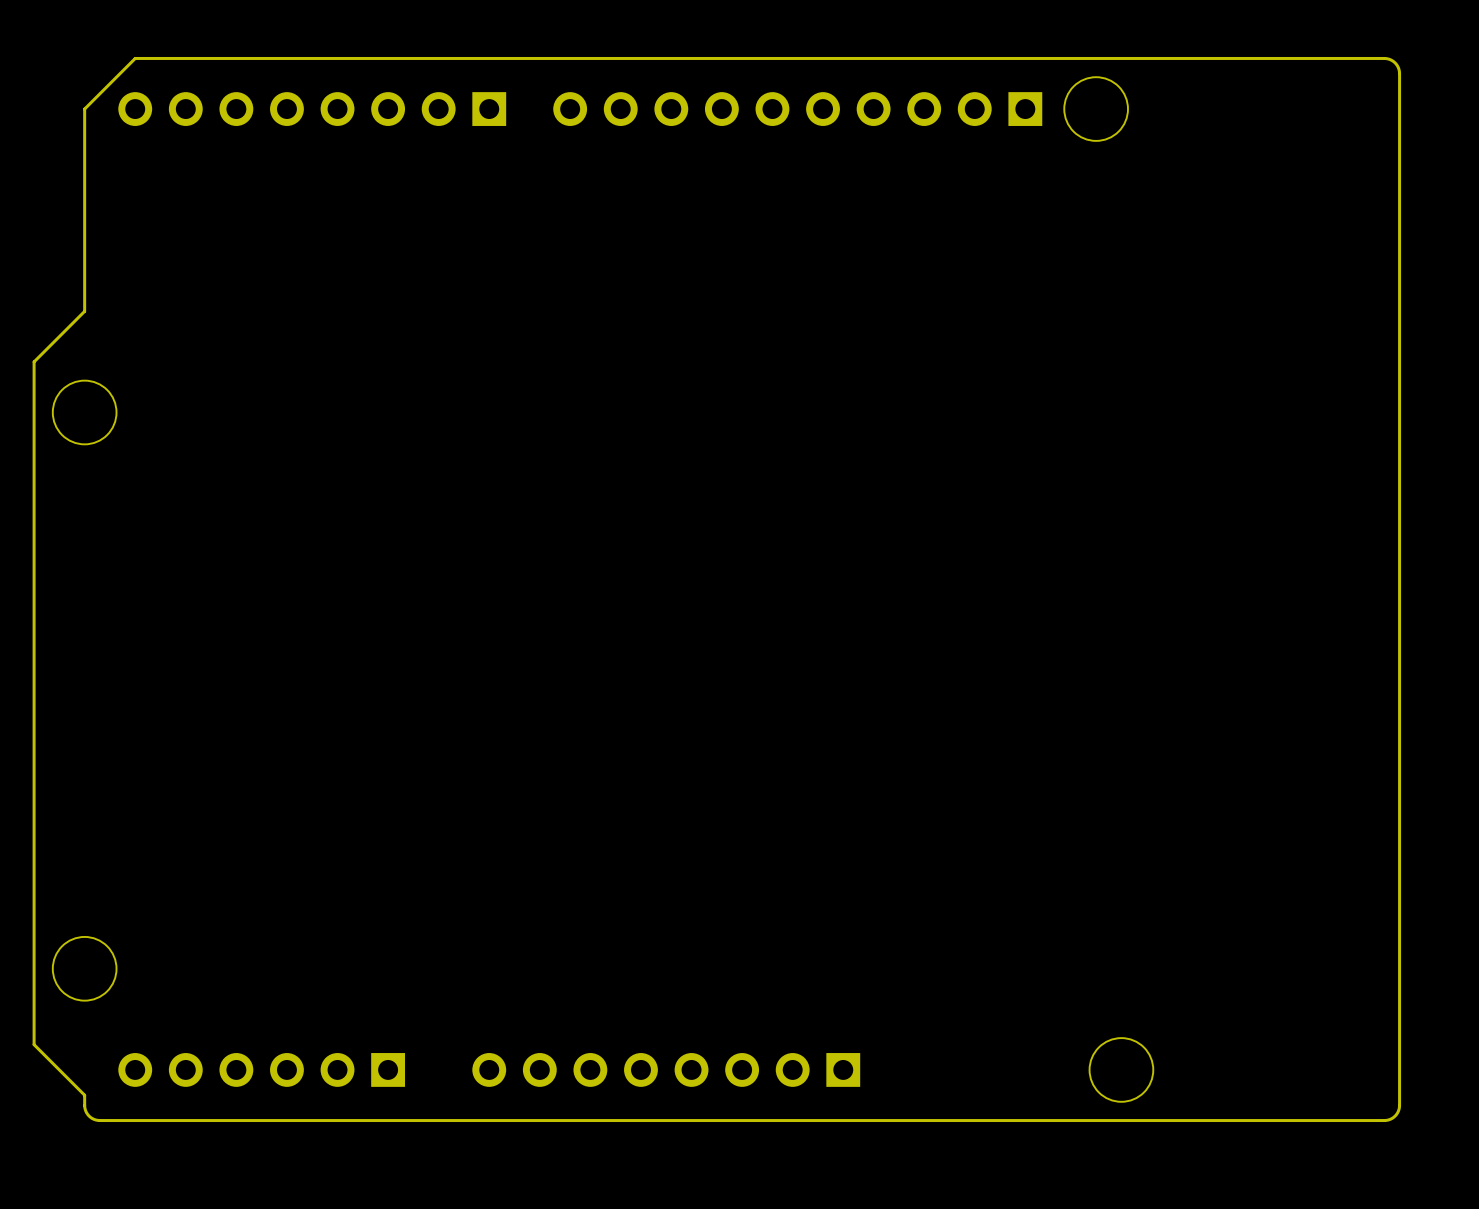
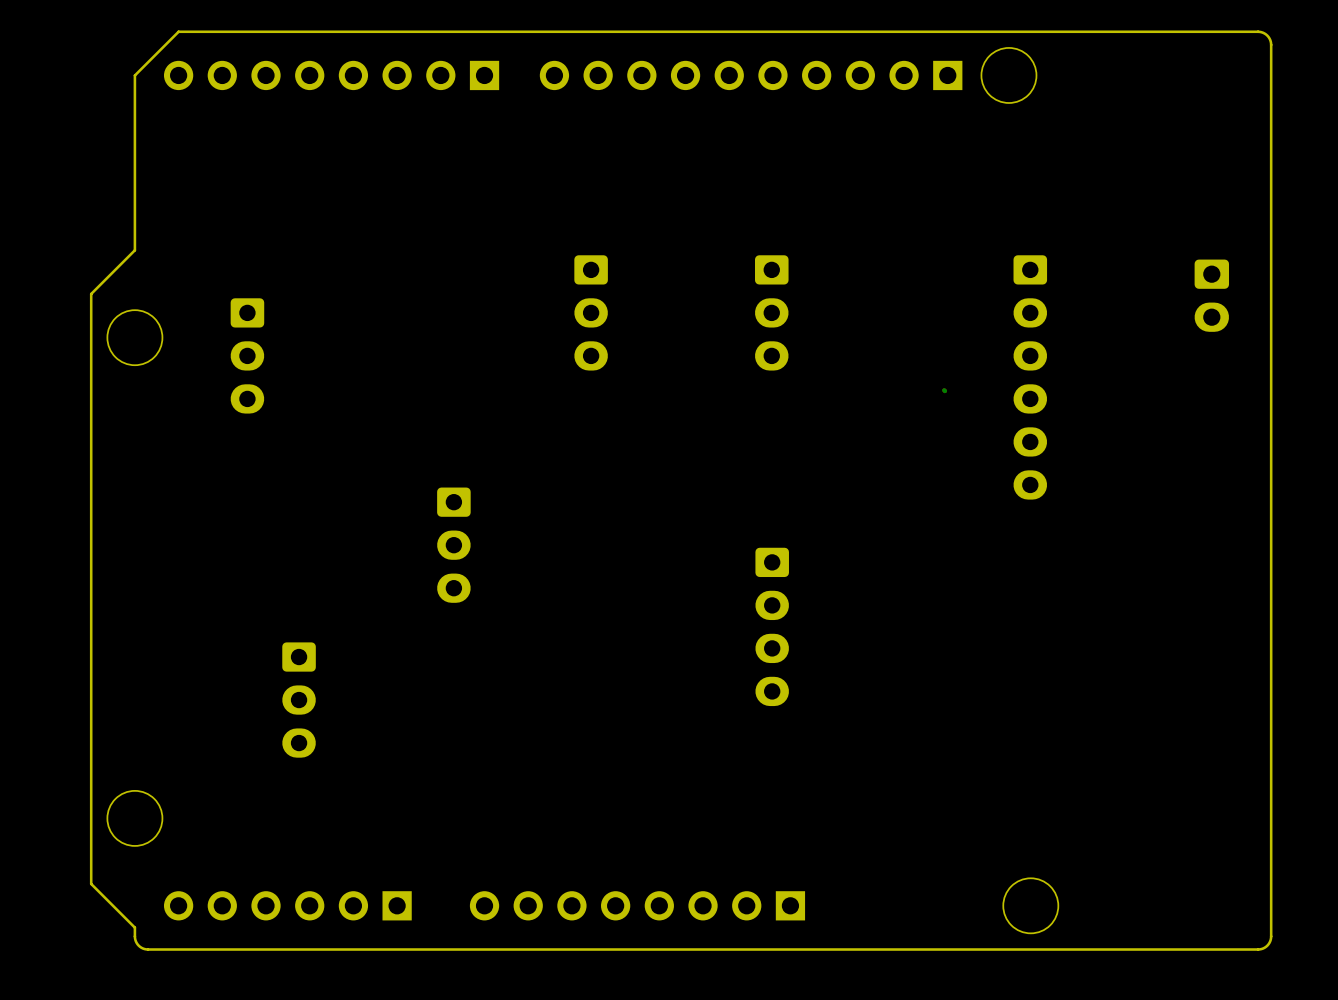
part: none -> (1211, 295)
part: none -> (591, 312)
part: none -> (771, 312)
part: none -> (247, 355)
part: none -> (1030, 377)
bottom track: none -> (944, 390) (944, 391)
part: none -> (453, 545)
part: none -> (772, 626)
part: none -> (299, 700)

